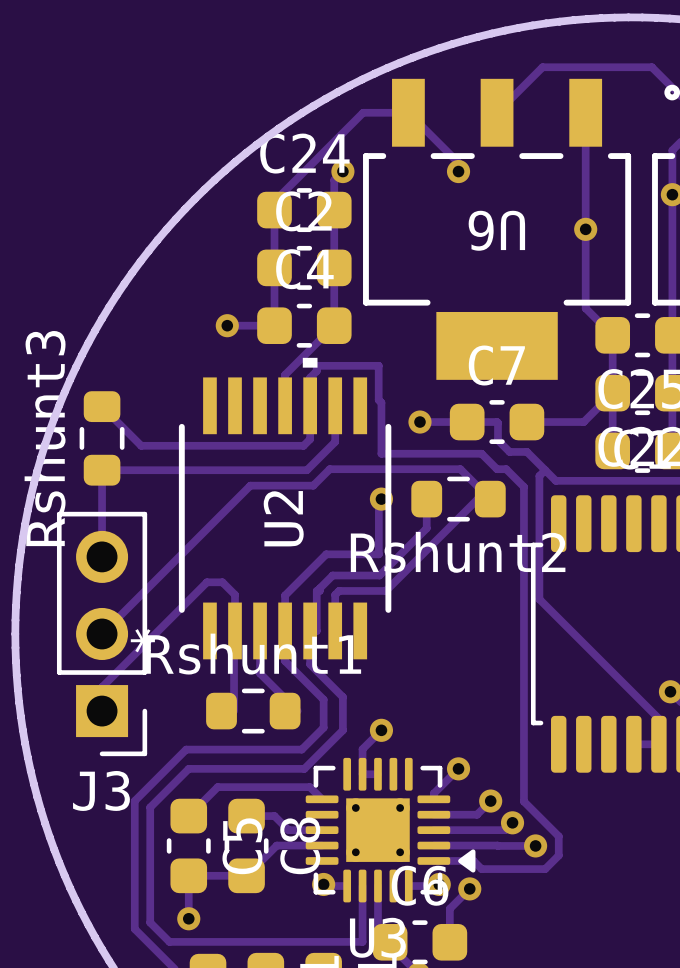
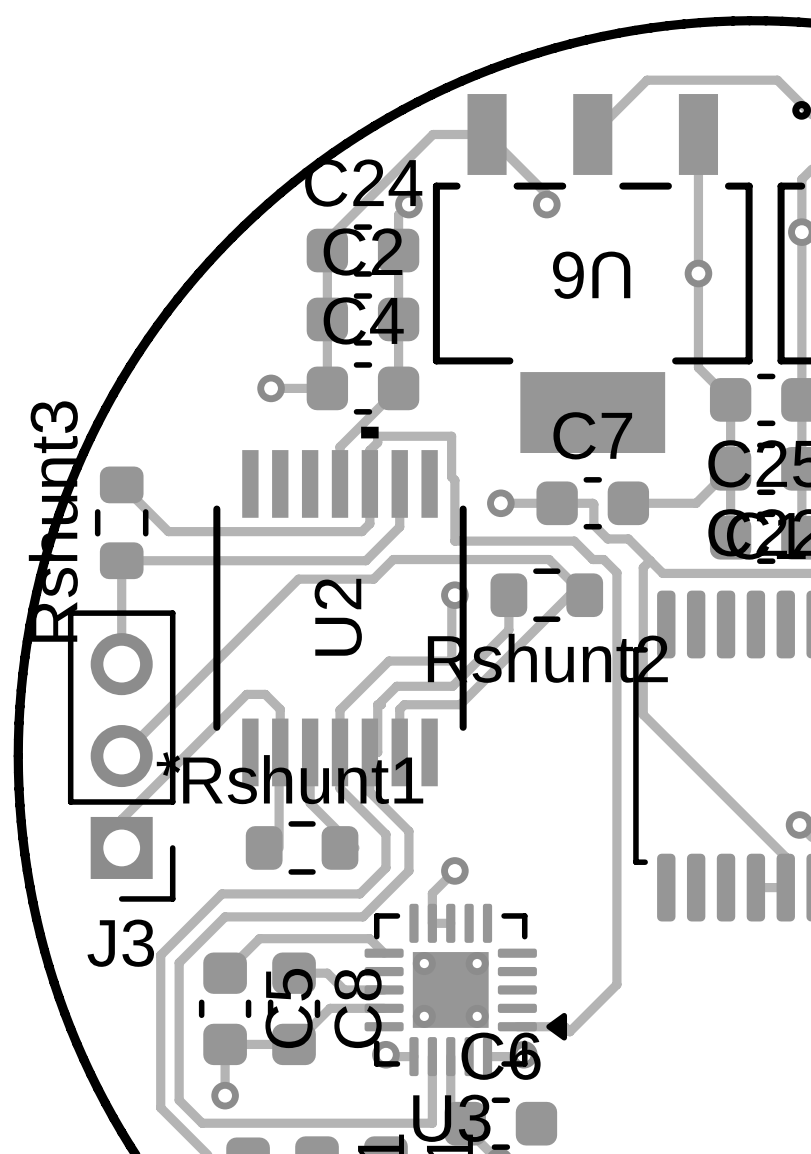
track: (517, 480) (523, 486) (523, 801) (558, 836) (558, 855) (545, 869) (481, 869) (477, 865) -> (616, 572) (616, 984) (569, 1031)
track: (458, 768) (433, 793) (433, 799) -> none
via: (458, 768) -> none
track: (490, 801) (477, 814) (433, 814) -> none
via: (490, 801) -> none
track: (512, 822) (505, 830) (433, 830) -> none
via: (512, 822) -> none
track: (433, 845) (497, 845) -> none
track: (497, 845) (535, 845) -> none
via: (535, 845) -> none
track: (469, 888) (449, 908) (449, 942) -> none
via: (469, 888) -> none

